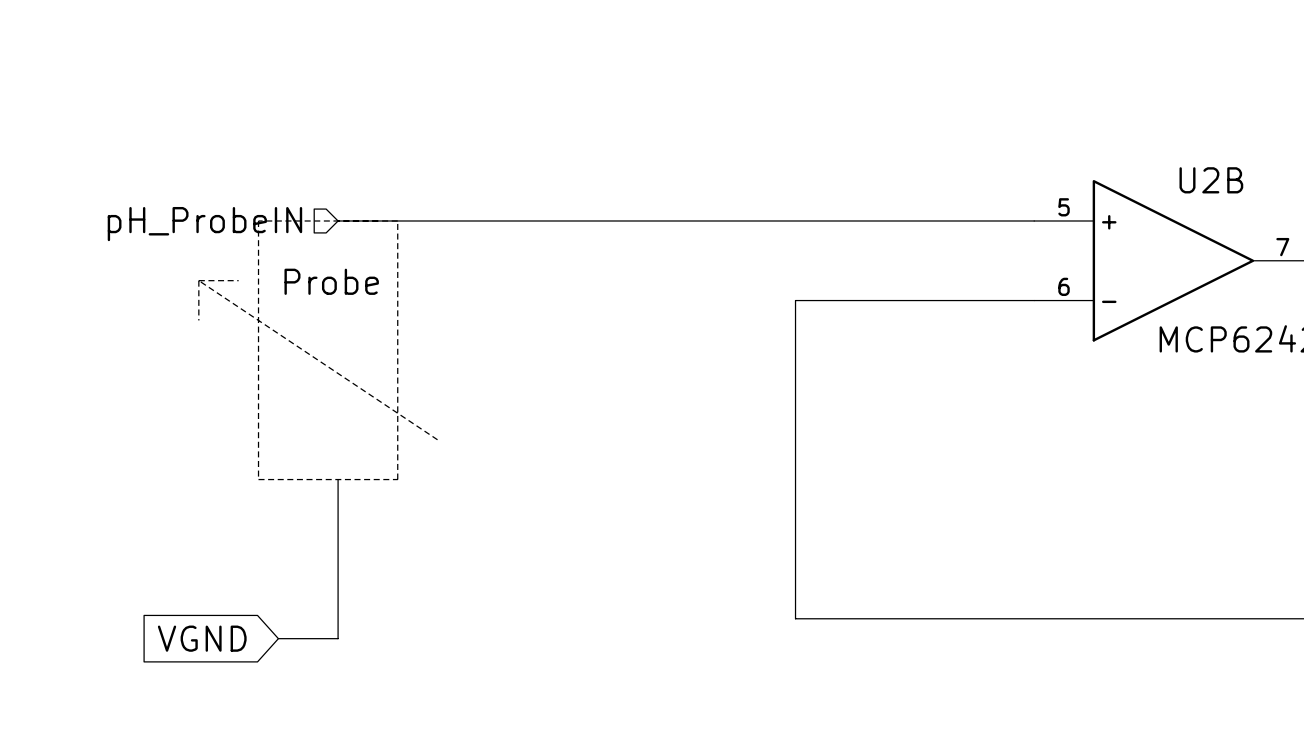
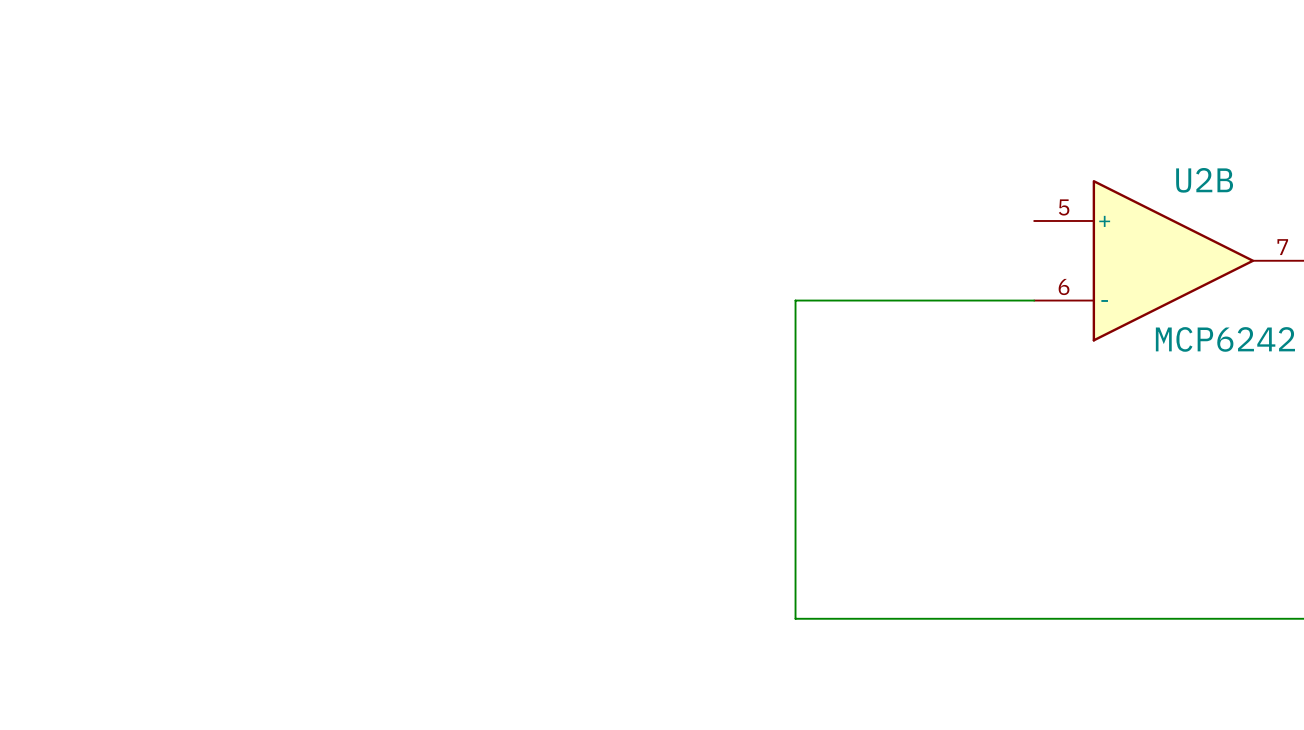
line: (258, 220) (397, 220) (397, 479) (258, 479) (258, 220) -> none
wire: (338, 220) (1034, 220) -> none
hierarchical label: pH_ProbeIN (204, 224) -> none
line: (198, 280) (437, 439) -> none
line: (198, 280) (198, 320) -> none
line: (198, 280) (238, 280) -> none
text: Probe (331, 281) -> none
wire: (338, 479) (338, 638) (278, 638) -> none
global label: VGND (202, 638) -> none

